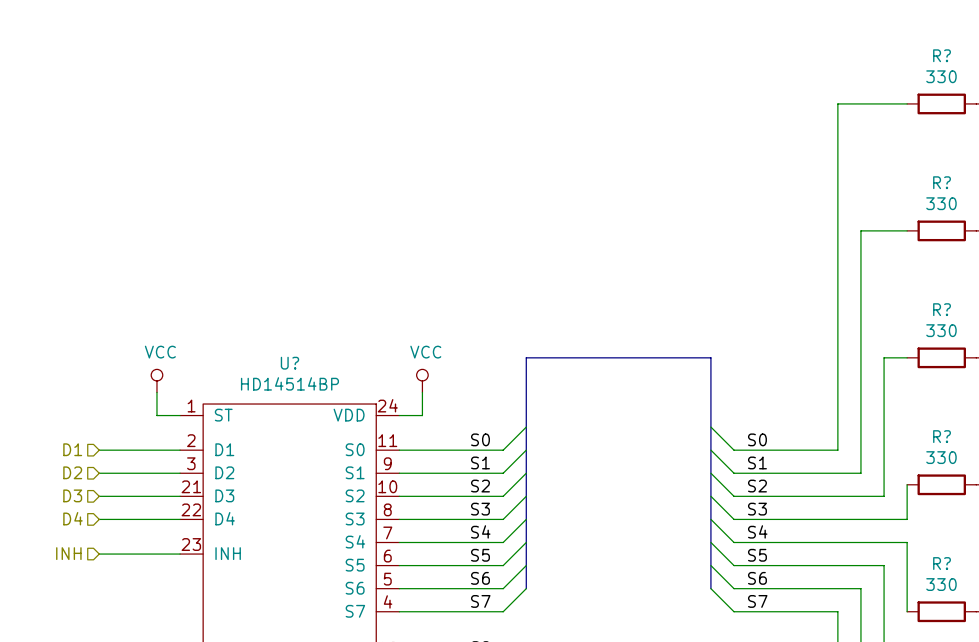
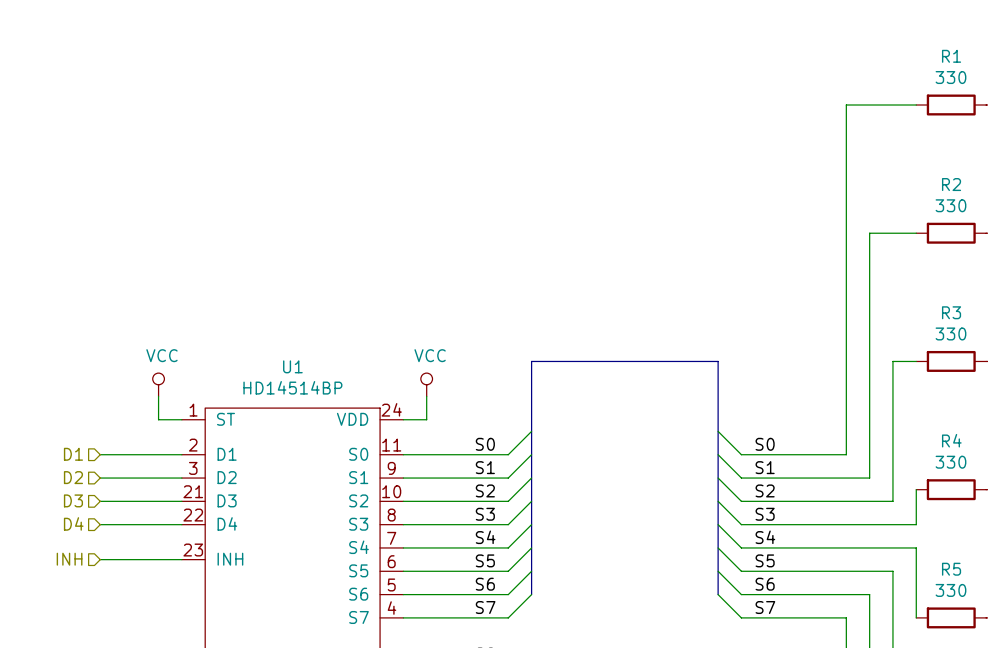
R? name: R? (942, 55) -> R1 (951, 56)
R? name: R? (942, 182) -> R2 (951, 184)
R? name: R? (942, 309) -> R3 (951, 312)
U? name: U? (289, 363) -> U1 (292, 366)
R? name: R? (942, 436) -> R4 (951, 440)
R? name: R? (942, 563) -> R5 (951, 569)

